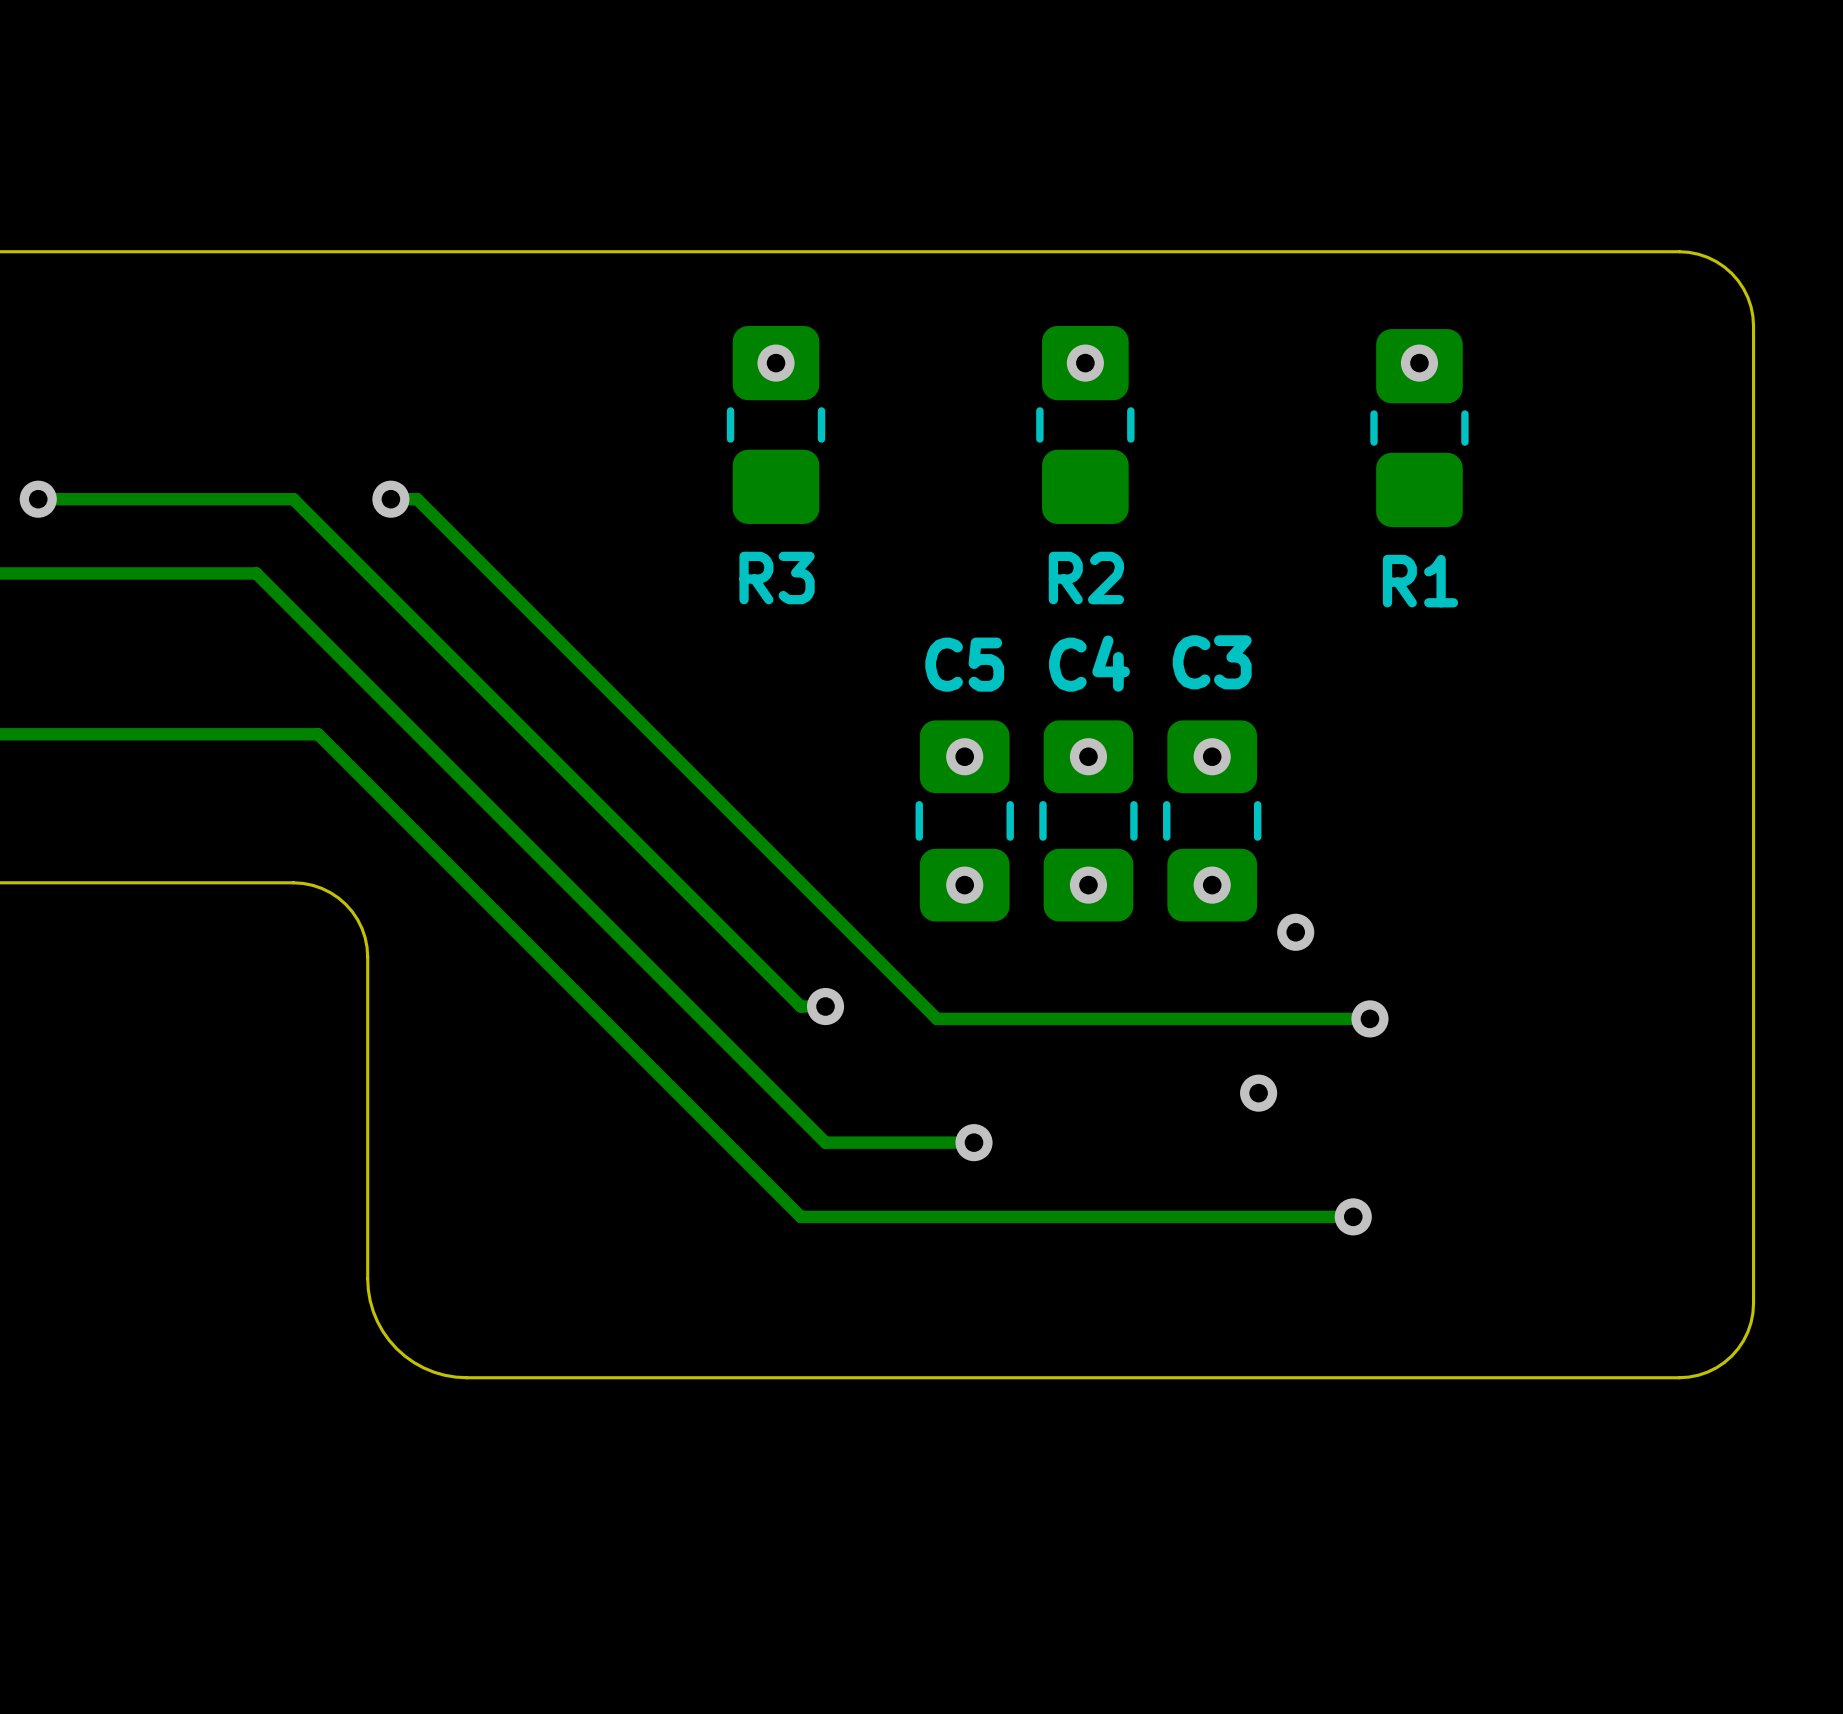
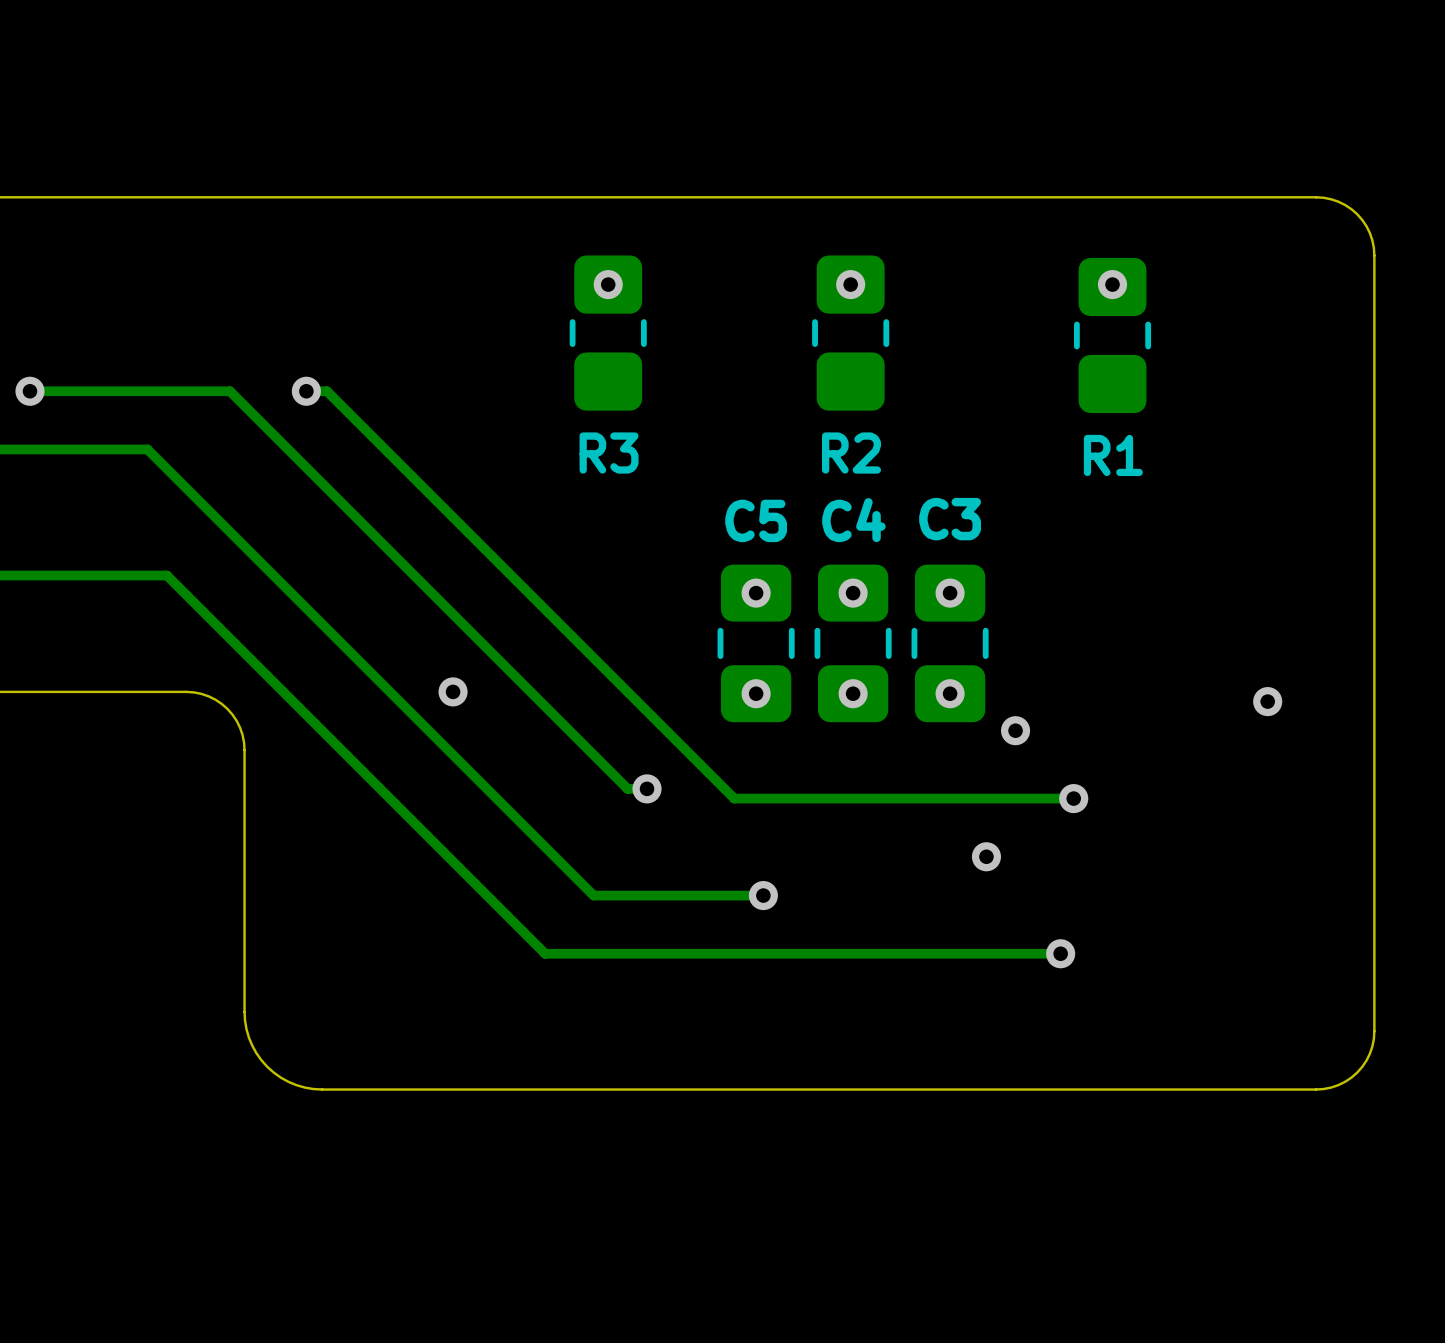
track: (188, 573) (256, 573) (825, 1142) -> (147, 449) (593, 895) (647, 895)
track: (213, 734) (318, 734) (800, 1216) -> (166, 575) (545, 953) (627, 953)
board edge: (237, 882) (303, 883) (321, 888) (345, 904) (362, 928) (367, 957) (367, 1278) (370, 1300) (382, 1331) (396, 1348) (423, 1367) (444, 1375) (466, 1377) (1679, 1377) (1707, 1372) (1731, 1355) (1747, 1331) (1753, 1303) -> (186, 691) (201, 693) (221, 703) (232, 714) (242, 735) (244, 750) (244, 1011) (246, 1029) (256, 1053) (267, 1066) (280, 1077) (304, 1087) (322, 1089) (1316, 1089) (1338, 1085) (1351, 1077) (1362, 1066) (1372, 1046) (1374, 1021)
via: none -> (453, 691)
via: none -> (1267, 701)

